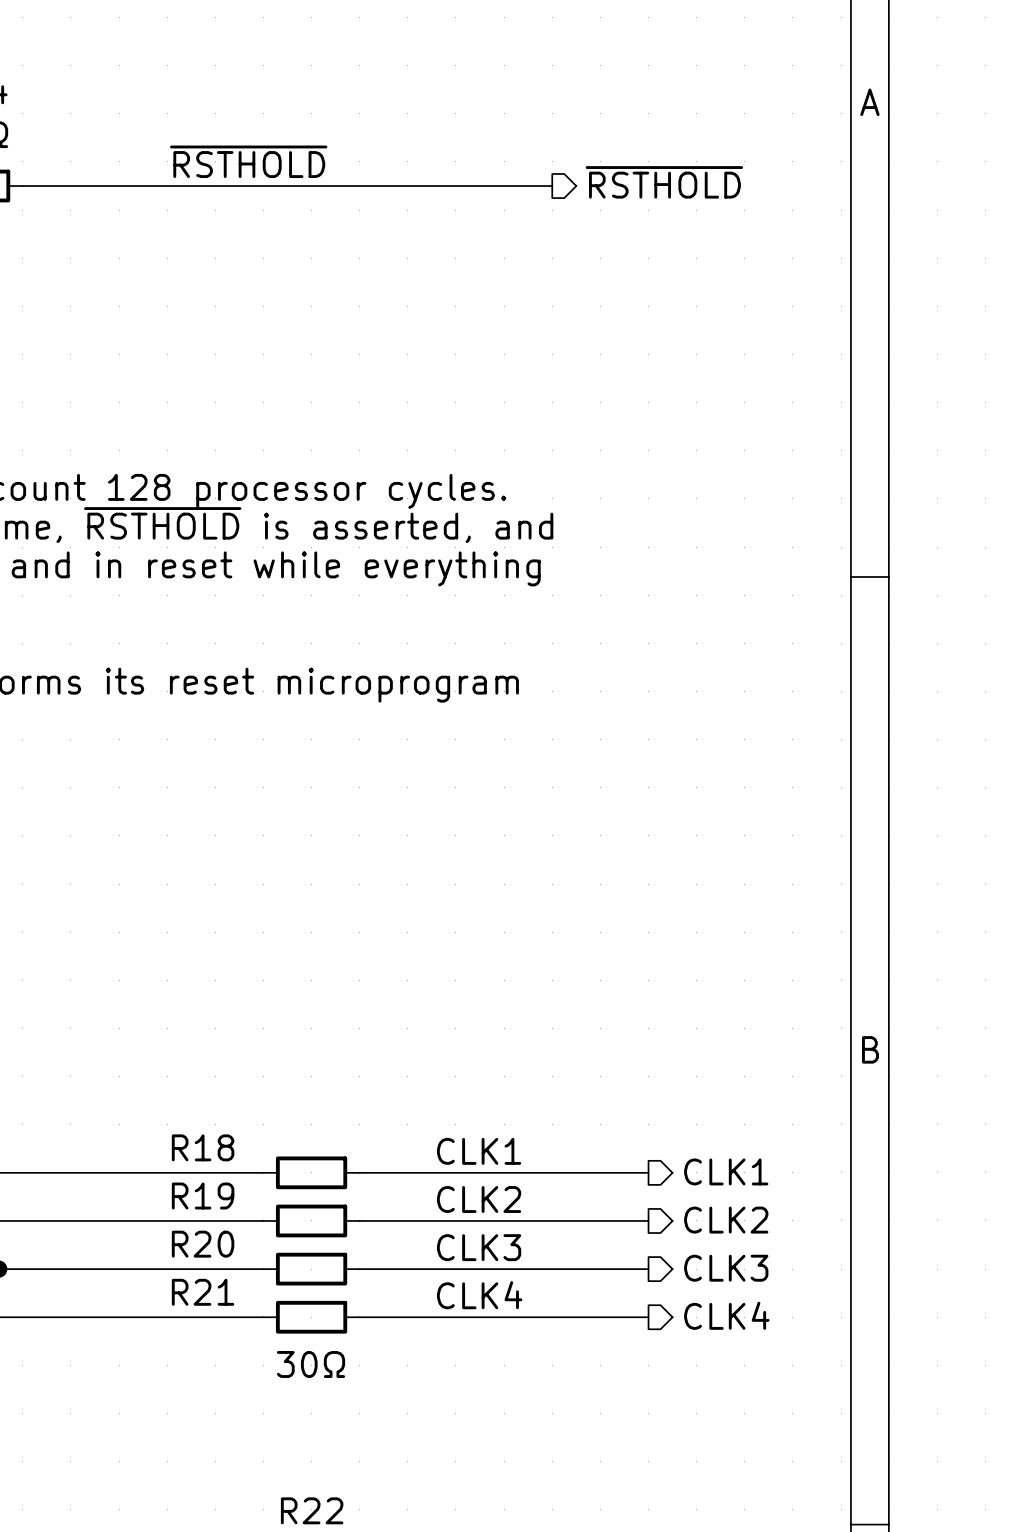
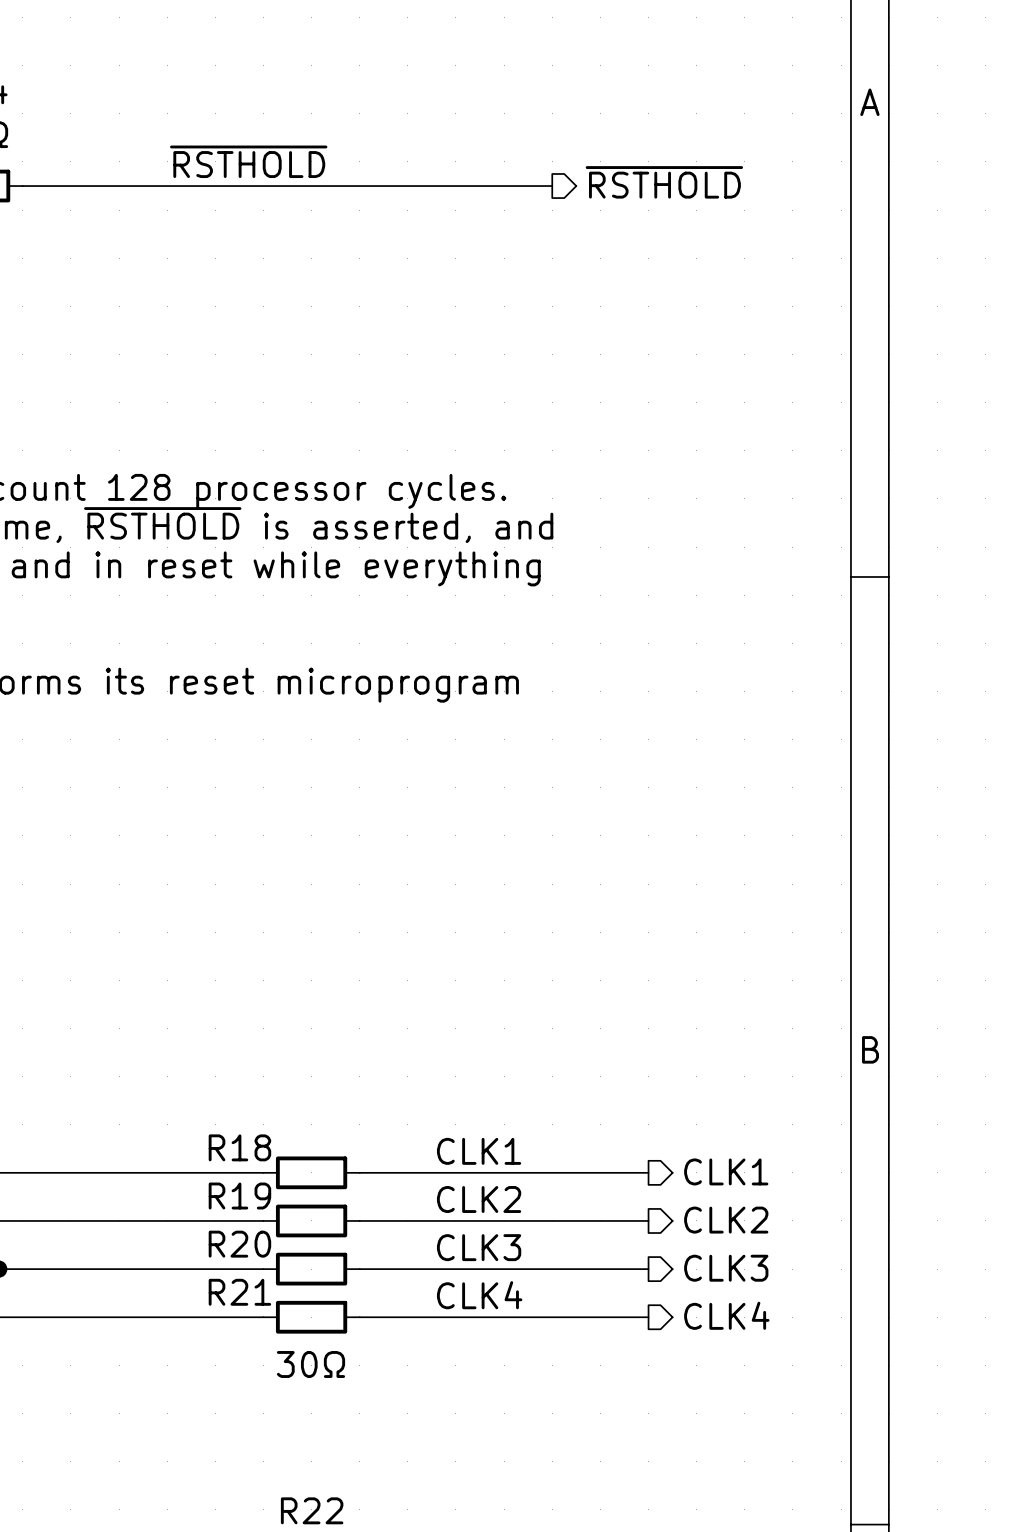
R18 name position: R18 (203, 1147) -> R18 (239, 1147)
R19 name position: R19 (203, 1196) -> R19 (239, 1196)
R20 name position: R20 (203, 1244) -> R20 (239, 1244)
R21 name position: R21 (203, 1292) -> R21 (239, 1292)

